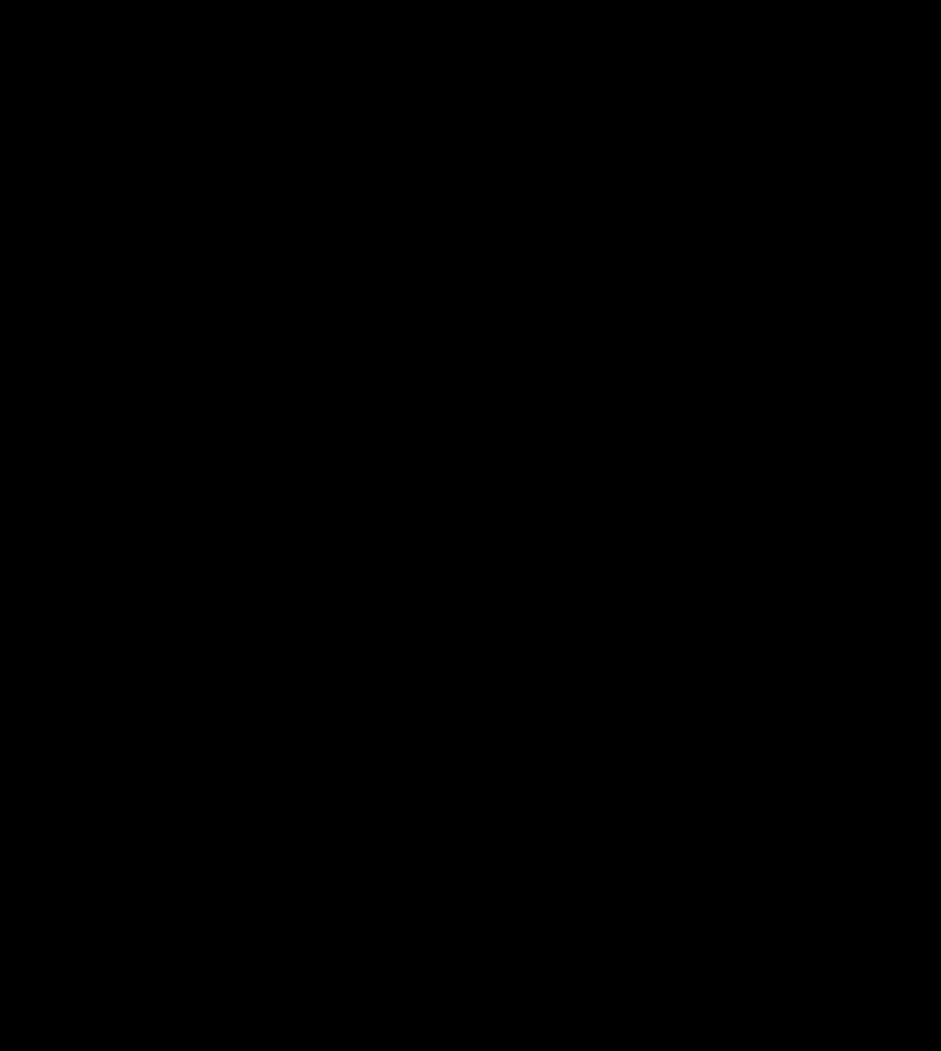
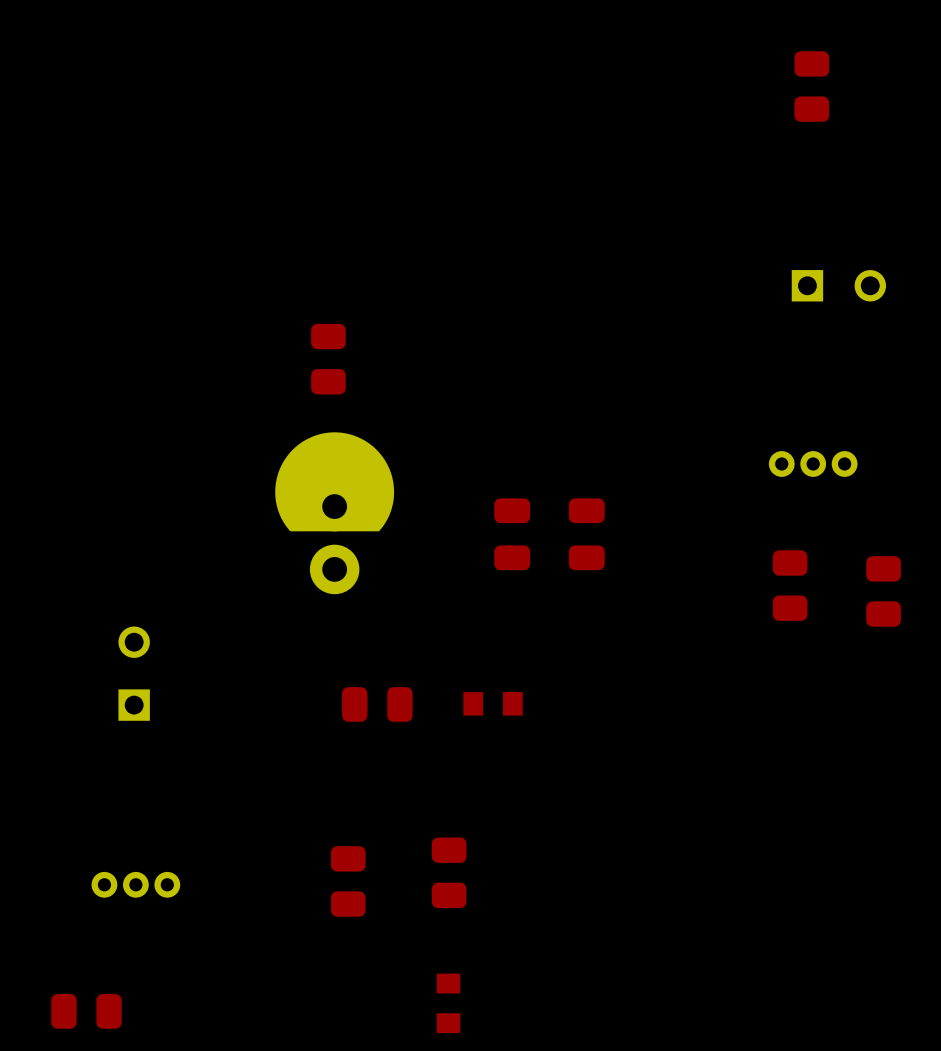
part: none -> (811, 86)
part: none -> (838, 285)
part: none -> (328, 359)
part: none -> (813, 463)
part: none -> (334, 513)
part: none -> (512, 534)
part: none -> (586, 534)
part: none -> (790, 585)
part: none -> (883, 591)
part: none -> (134, 673)
part: none -> (493, 703)
part: none -> (377, 704)
part: none -> (449, 872)
part: none -> (348, 881)
part: none -> (135, 884)
part: none -> (448, 1003)
part: none -> (86, 1011)

